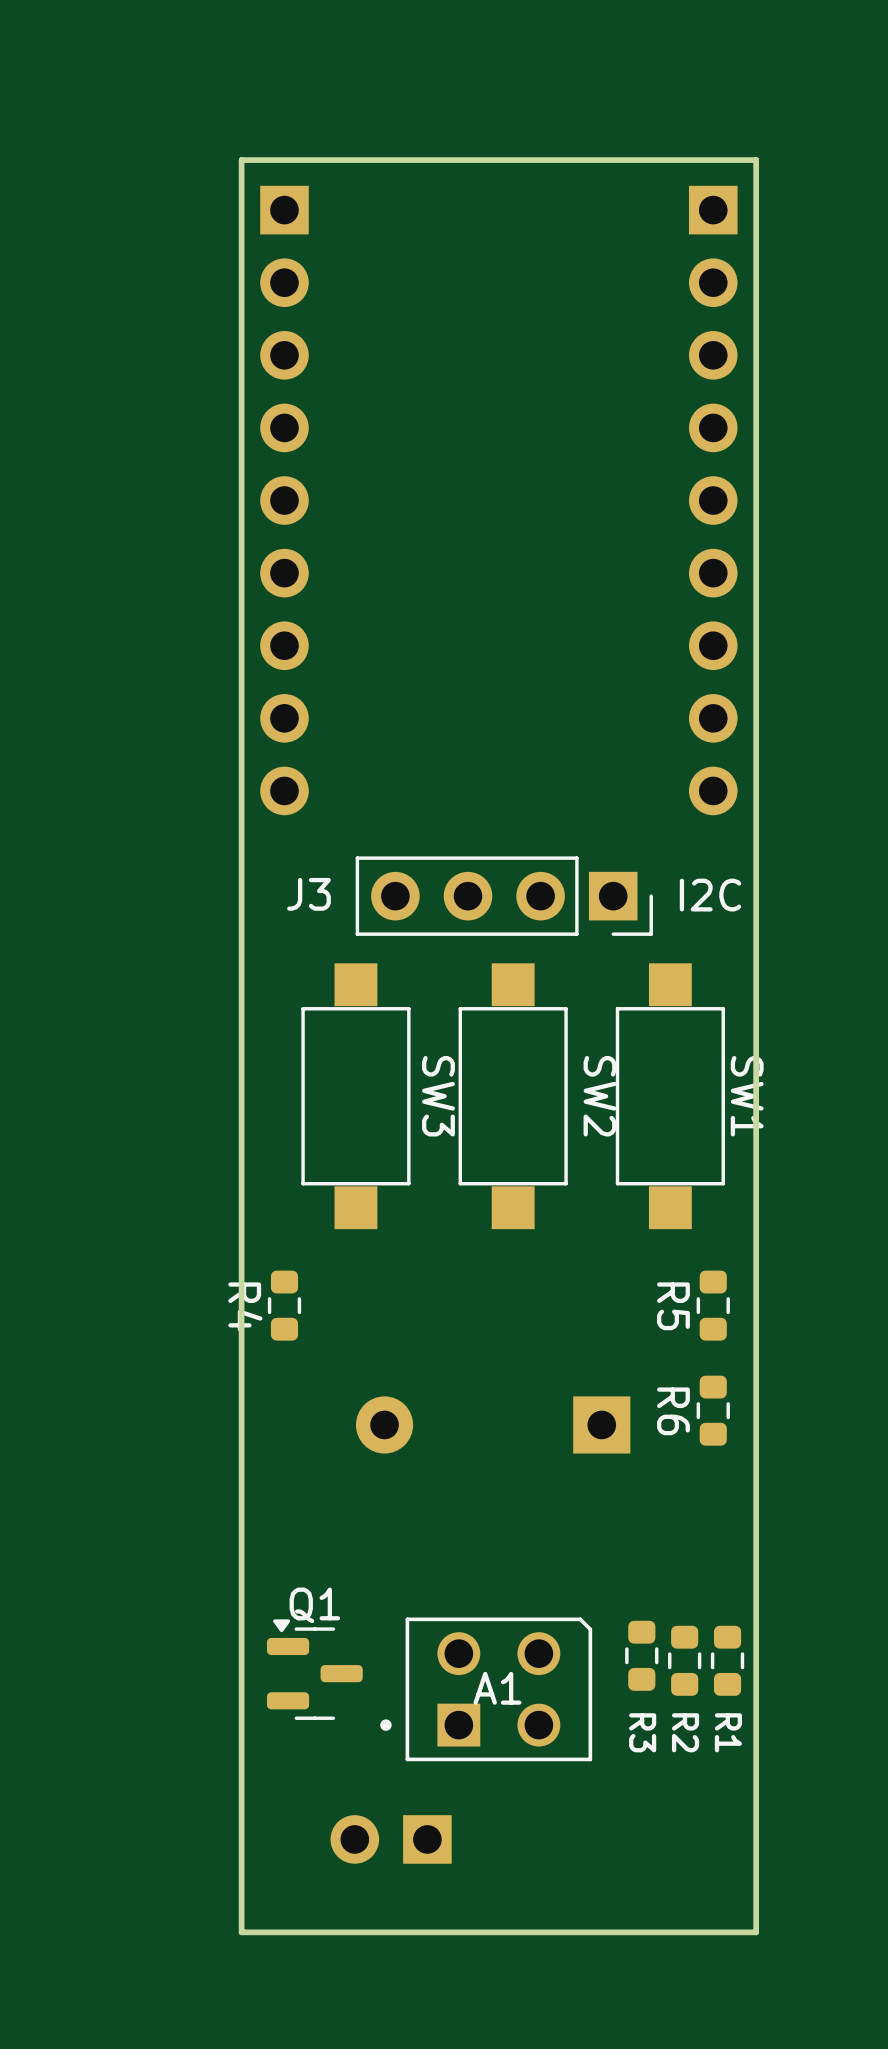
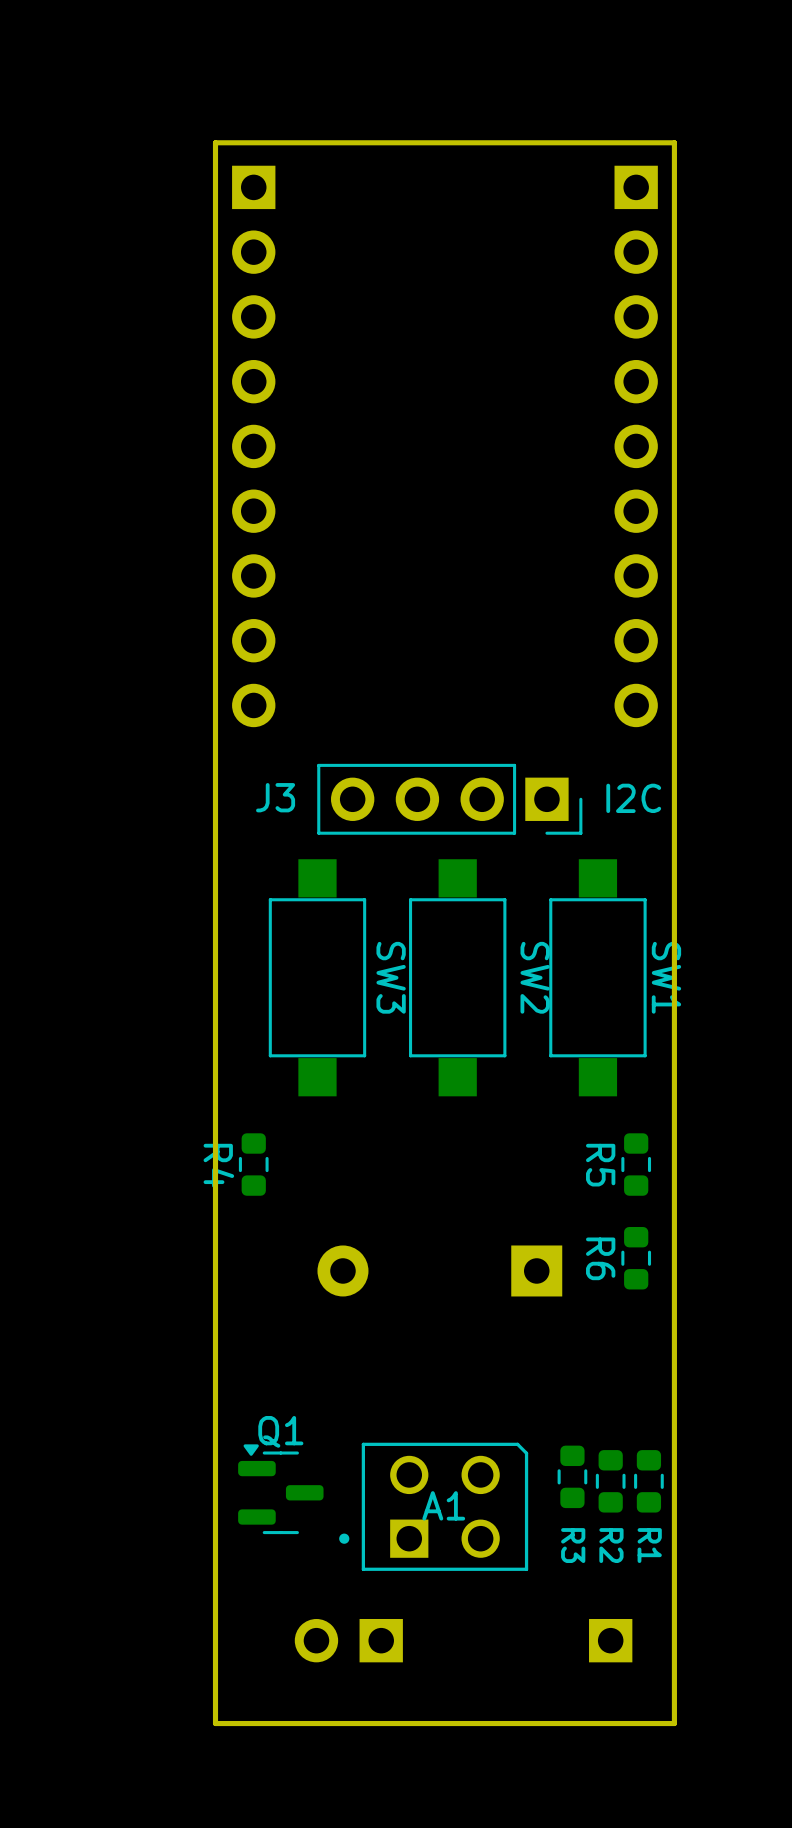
part: none -> (610, 1640)

